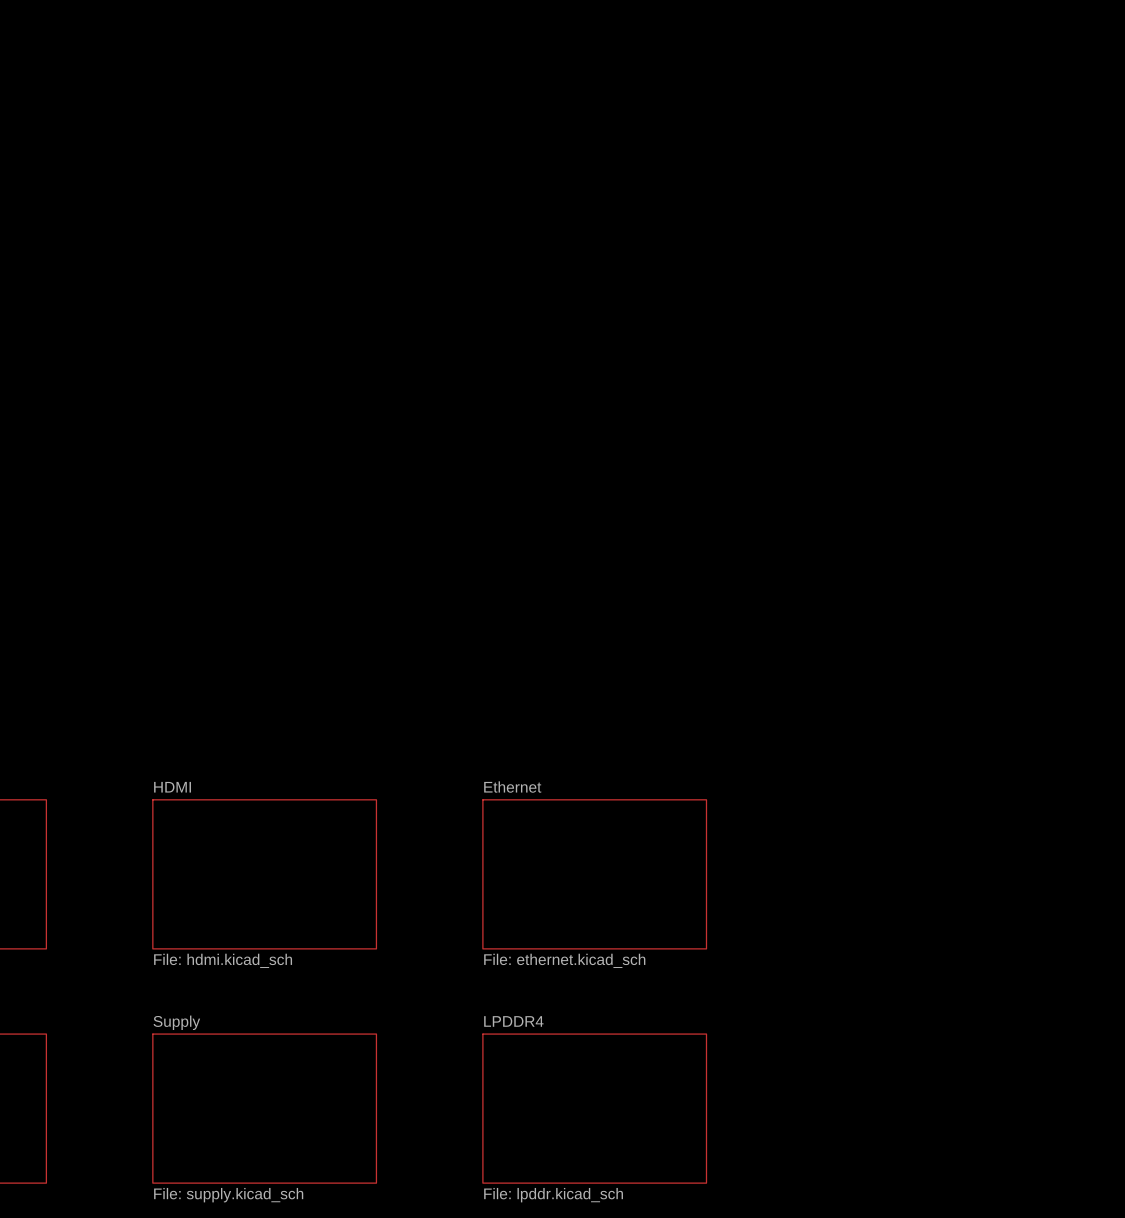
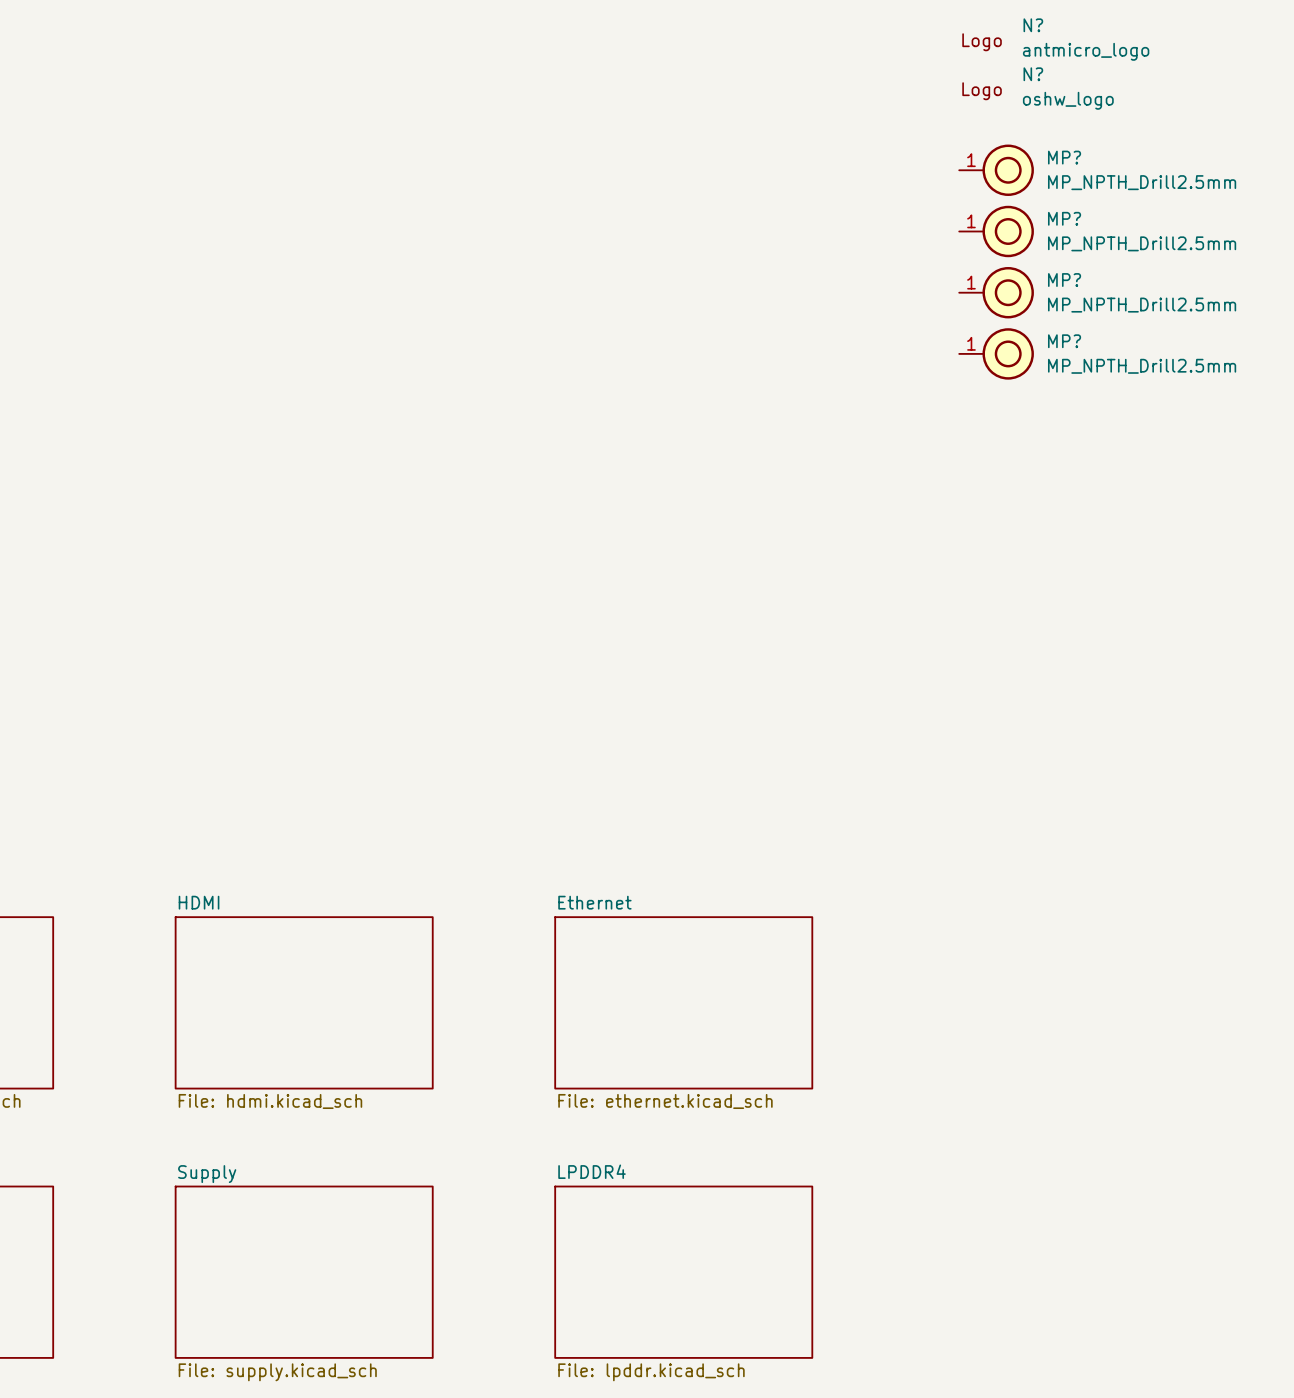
N?: none -> antmicro_logo (1055, 39)
N?: none -> oshw_logo (1038, 88)
MP?: none -> MP_NPTH_Drill2.5mm (996, 170)
MP?: none -> MP_NPTH_Drill2.5mm (996, 231)
MP?: none -> MP_NPTH_Drill2.5mm (996, 292)
MP?: none -> MP_NPTH_Drill2.5mm (996, 353)

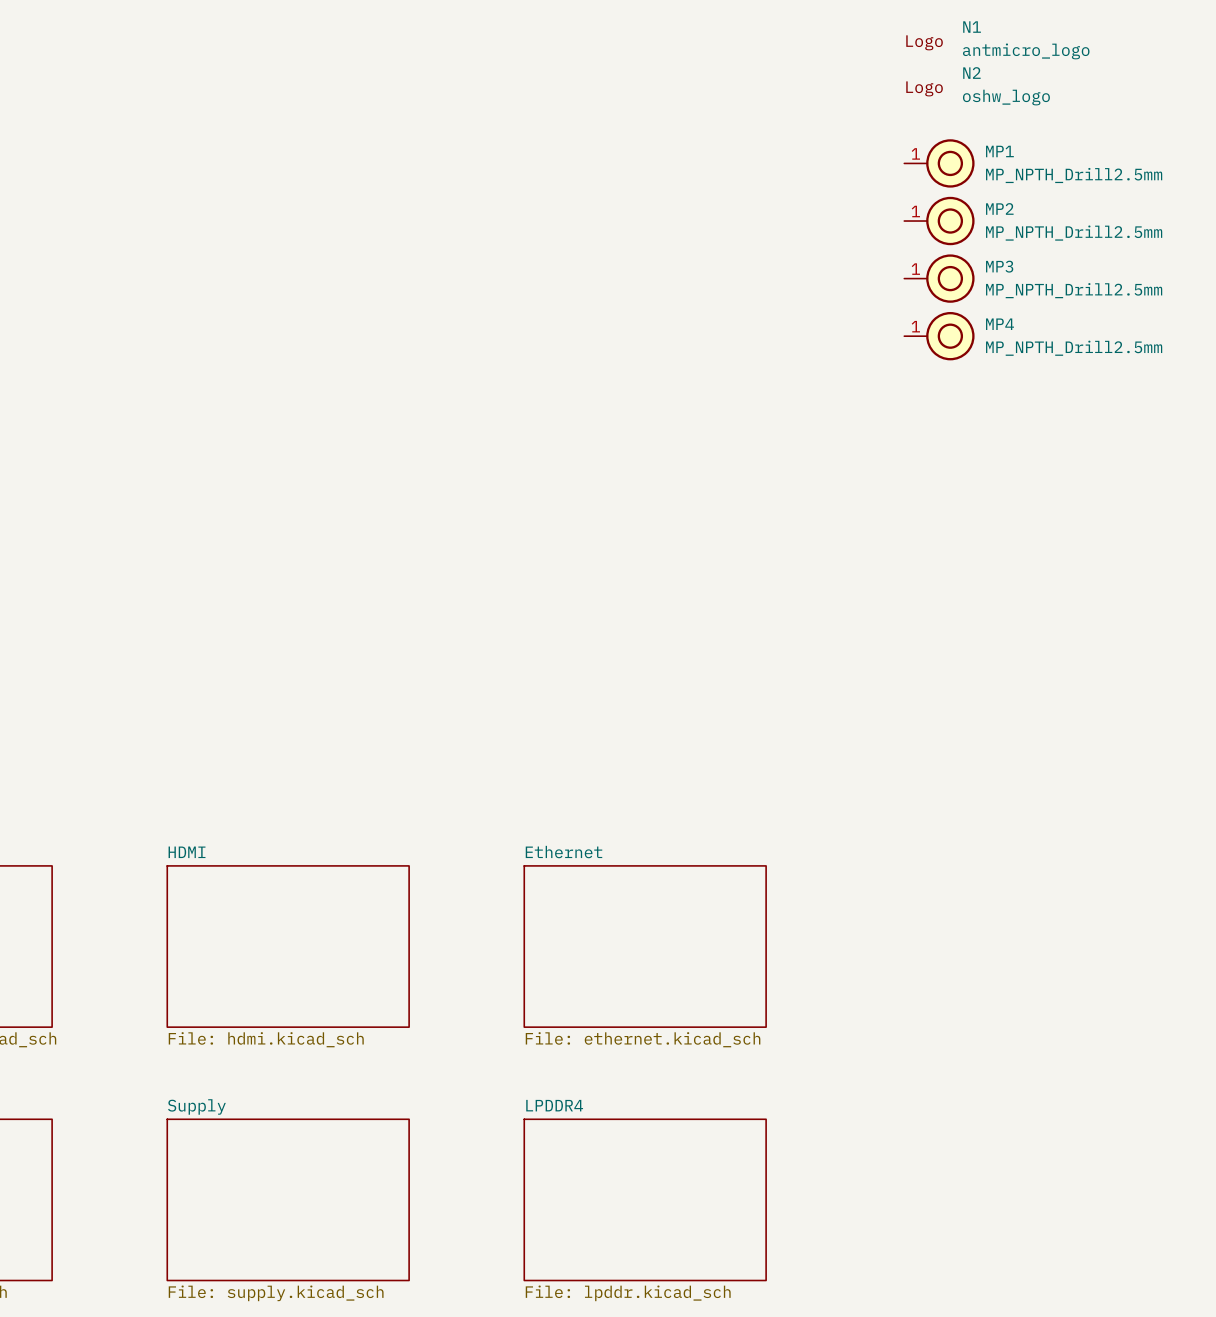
N? name: N? (1033, 25) -> N1 (972, 27)
N? name: N? (1033, 74) -> N2 (971, 73)
MP? name: MP? (1064, 157) -> MP1 (999, 151)
MP? name: MP? (1064, 218) -> MP2 (999, 208)
MP? name: MP? (1064, 280) -> MP3 (999, 266)
MP? name: MP? (1064, 341) -> MP4 (1000, 324)

